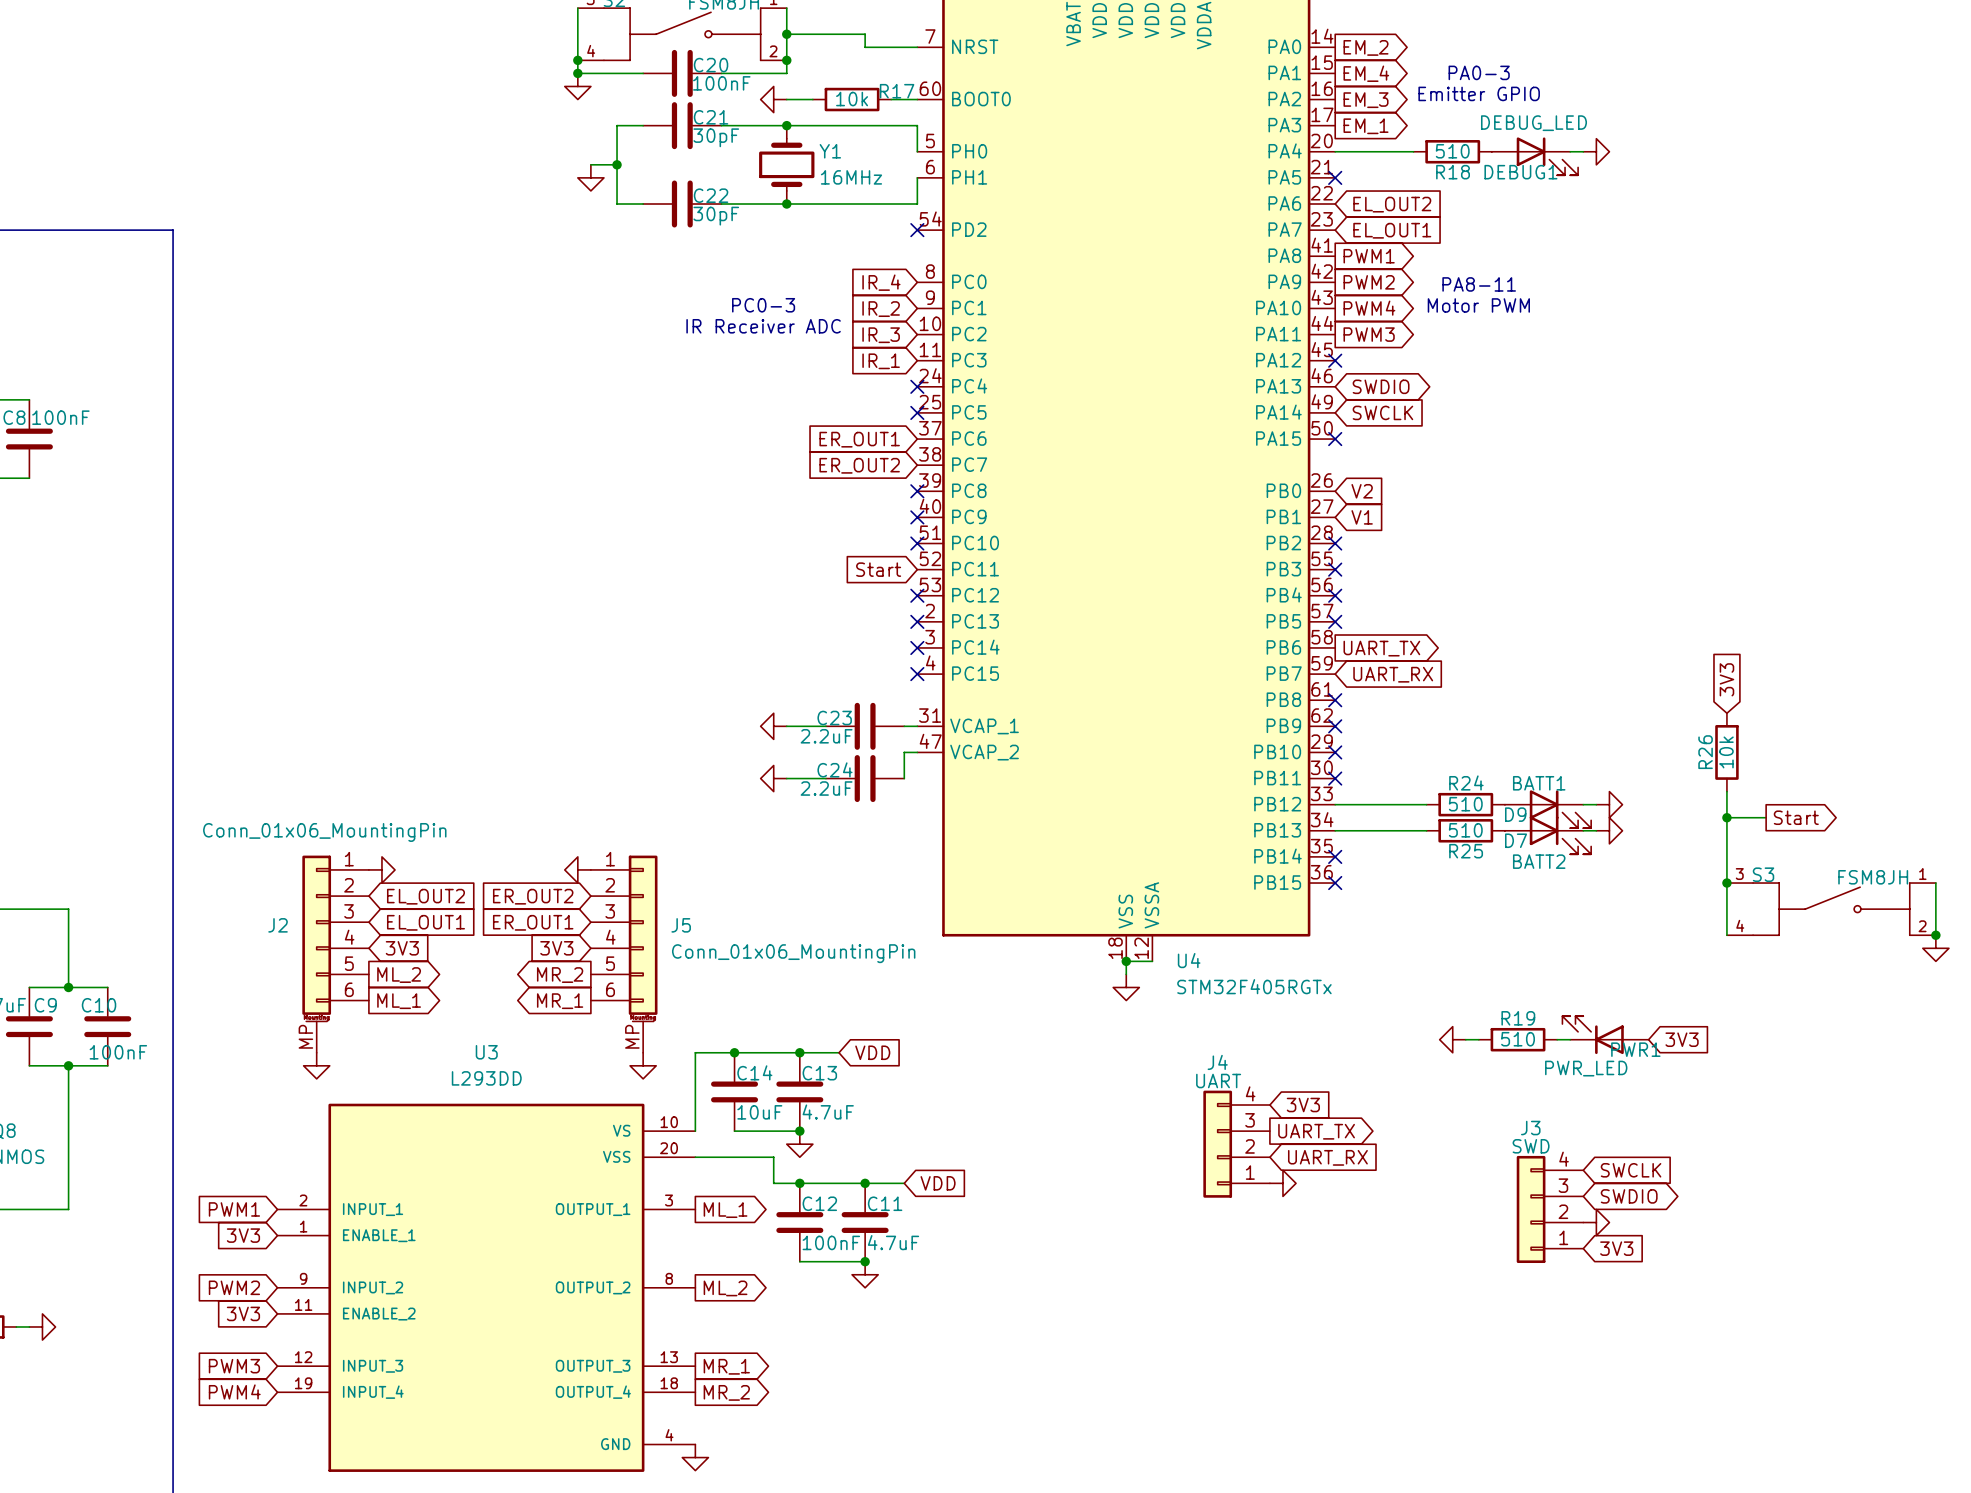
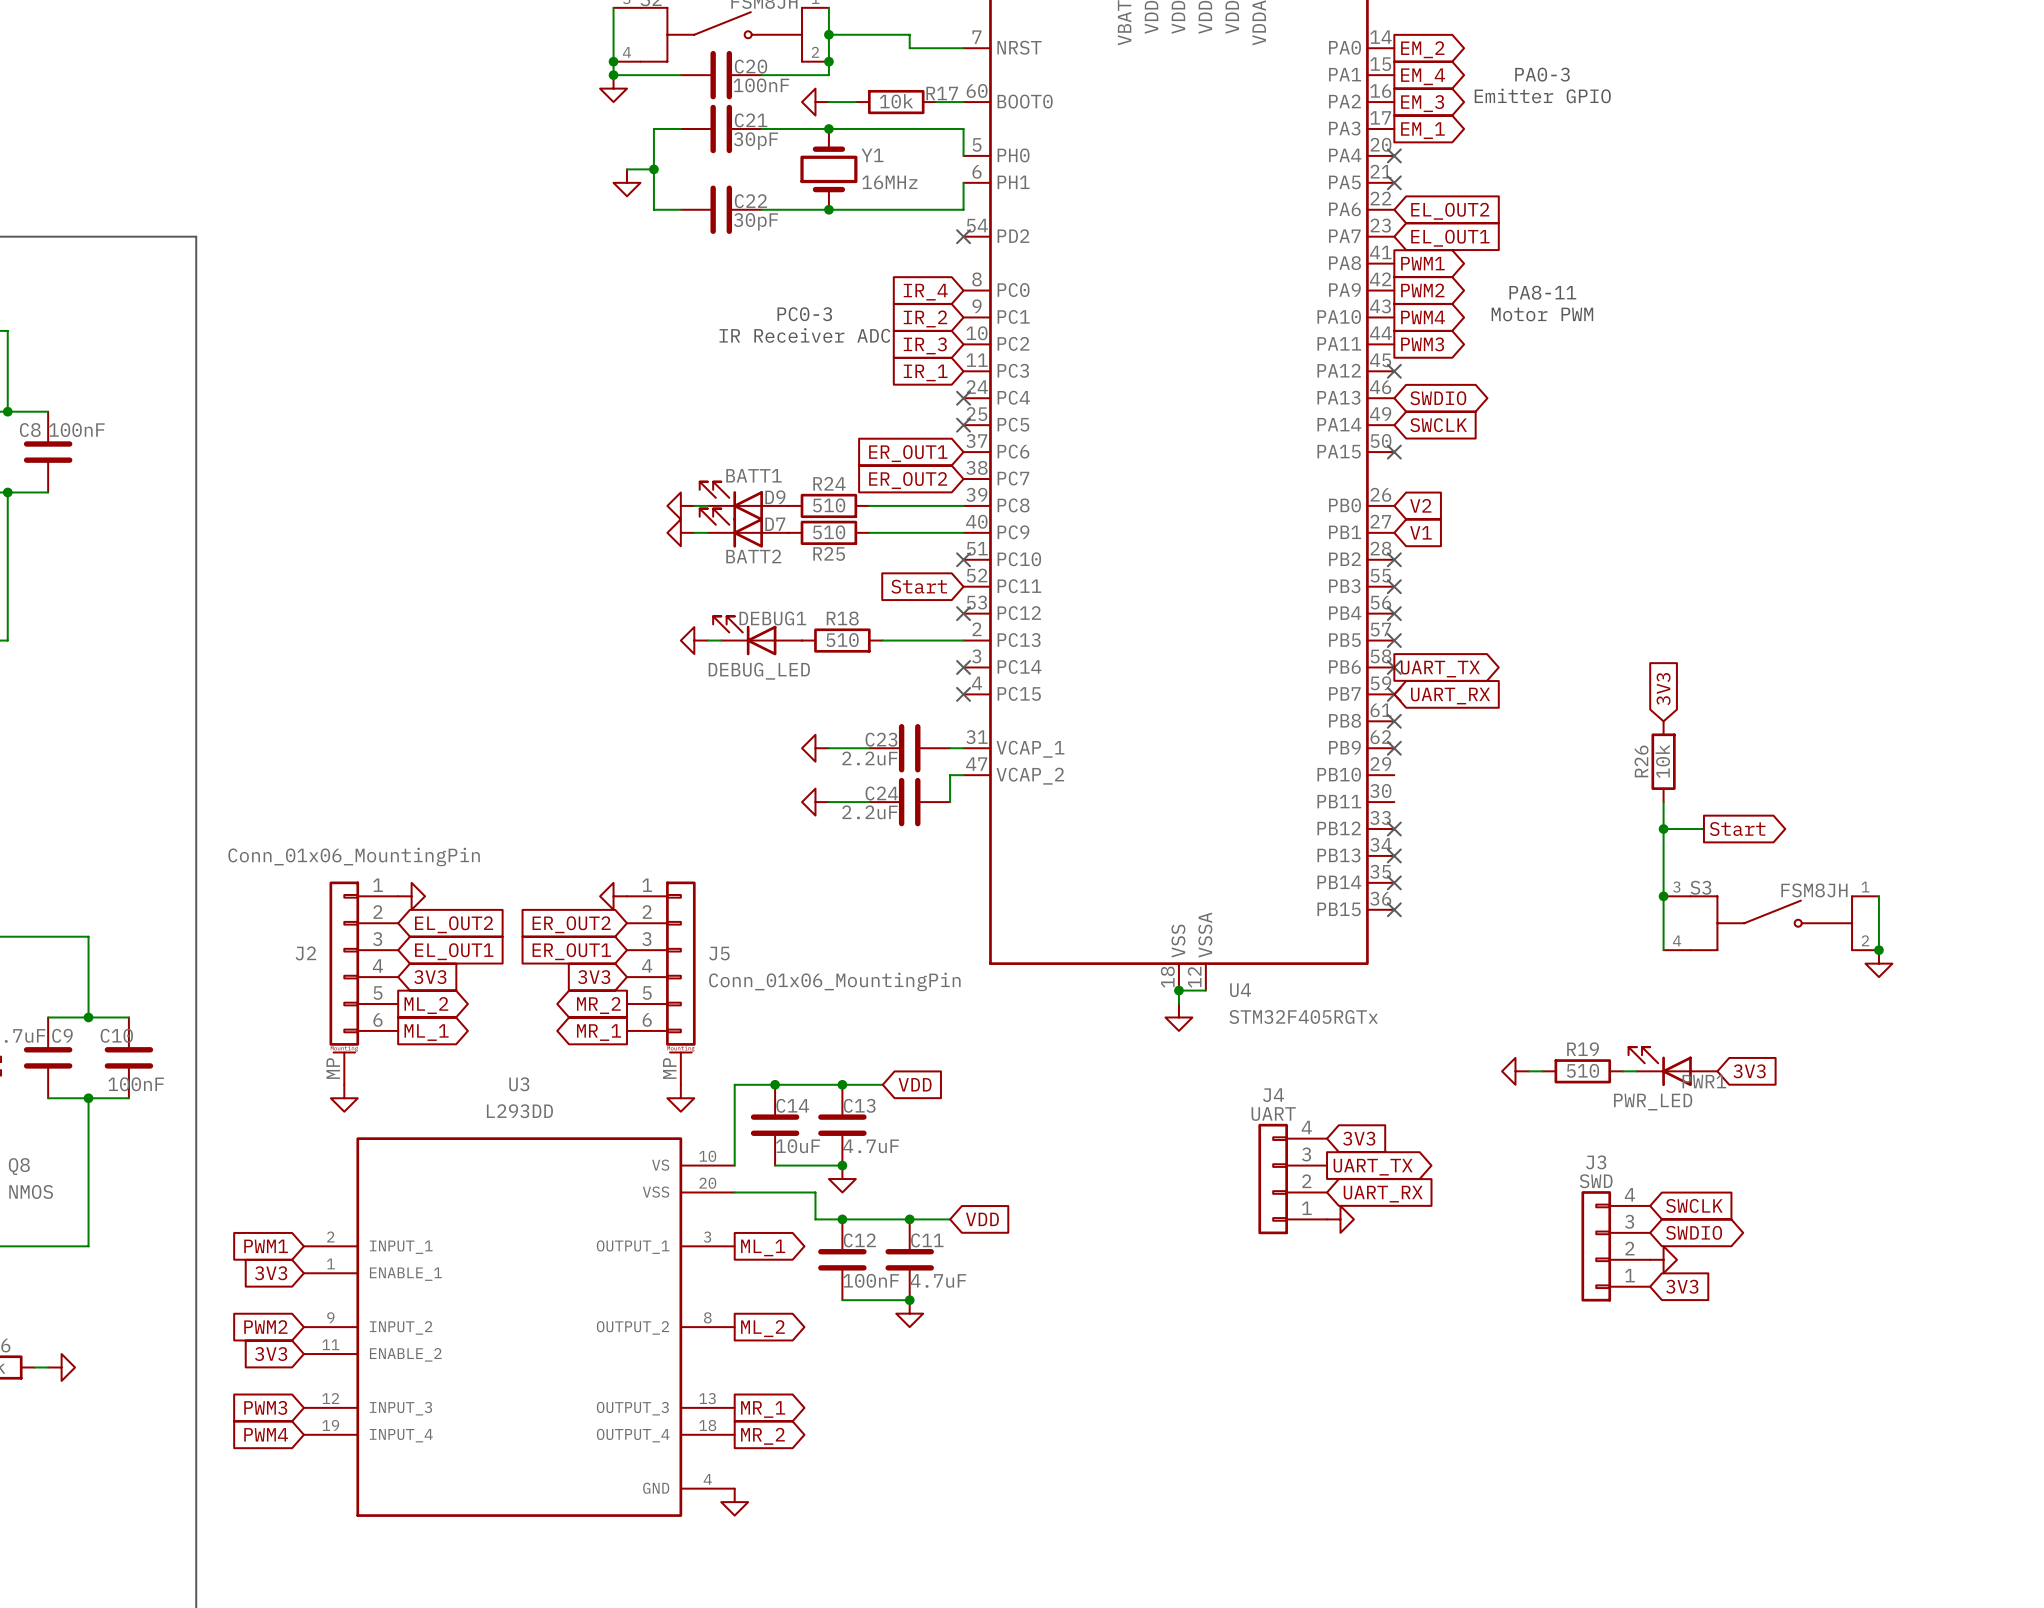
wire: (1335, 151) (1413, 151) -> none
no-connect mark: none -> (1394, 155)
R18 position: (1452, 151) -> (842, 640)
wire: (1570, 151) (1583, 151) -> none
power symbol: (1596, 151) -> none
DEBUG1 position: (1535, 156) -> (757, 635)
DEBUG1 rotation: 0° (1547, 156) -> 180° (744, 635)
R18 name position: R18 (1453, 172) -> R18 (842, 618)
power symbol: none -> (680, 505)
wire: none -> (694, 505) (707, 505)
wire: none -> (869, 505) (963, 505)
no-connect mark: (917, 491) -> none
power symbol: none -> (680, 532)
wire: none -> (694, 532) (707, 532)
wire: none -> (869, 532) (963, 532)
no-connect mark: (917, 517) -> none
power symbol: none -> (694, 640)
wire: none -> (707, 640) (721, 640)
wire: none -> (882, 640) (963, 640)
no-connect mark: (917, 621) -> none
no-connect mark: none -> (1394, 667)
no-connect mark: none -> (1394, 694)
global label position: 3V3 (1726, 679) -> 3V3 (1663, 689)
no-connect mark: (1335, 752) -> none
R26 position: (1726, 752) -> (1663, 761)
no-connect mark: (1335, 778) -> none
wire: (1726, 791) (1726, 935) -> (1663, 802) (1663, 950)
wire: (1335, 804) (1426, 804) -> none
no-connect mark: none -> (1394, 829)
R24 position: (1465, 804) -> (828, 505)
wire: (1583, 804) (1596, 804) -> (1703, 829) (1663, 829)
junction: none -> (1663, 829)
power symbol: (1609, 804) -> none
D9 position: (1548, 809) -> (744, 501)
D9 rotation: 0° (1560, 809) -> 180° (731, 501)
wire: (1726, 817) (1766, 817) -> none
junction: (1726, 817) -> none
global label position: Start (1796, 817) -> Start (1737, 829)
wire: (1335, 830) (1426, 830) -> none
no-connect mark: none -> (1394, 855)
R25 position: (1465, 830) -> (828, 532)
wire: (1583, 830) (1596, 830) -> none
power symbol: (1609, 830) -> none
D7 position: (1548, 835) -> (744, 528)
D7 rotation: 0° (1560, 835) -> 180° (731, 528)
junction: none -> (1663, 896)
junction: (1726, 883) -> none
wire: (1935, 883) (1935, 935) -> (1878, 896) (1878, 950)
S3 position: (1831, 909) -> (1771, 923)
junction: none -> (1878, 950)
power symbol: none -> (1878, 963)
junction: (1935, 935) -> none
power symbol: (1935, 948) -> none

